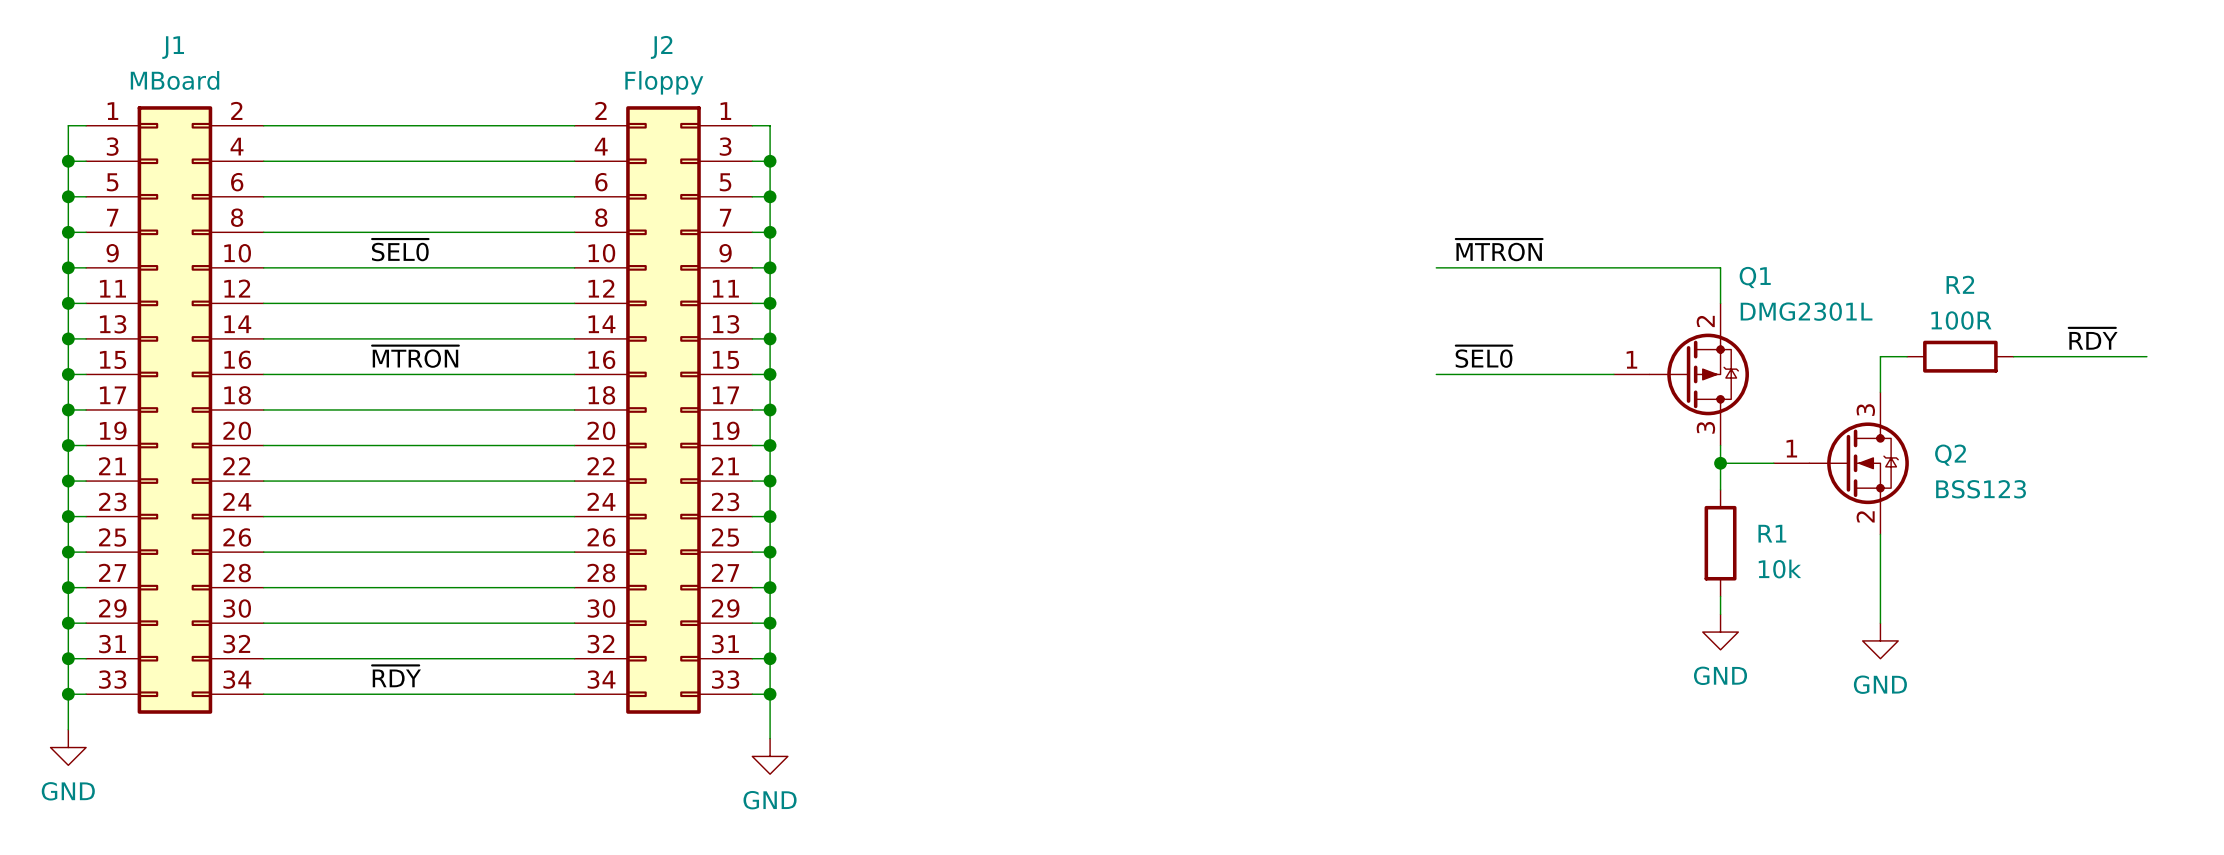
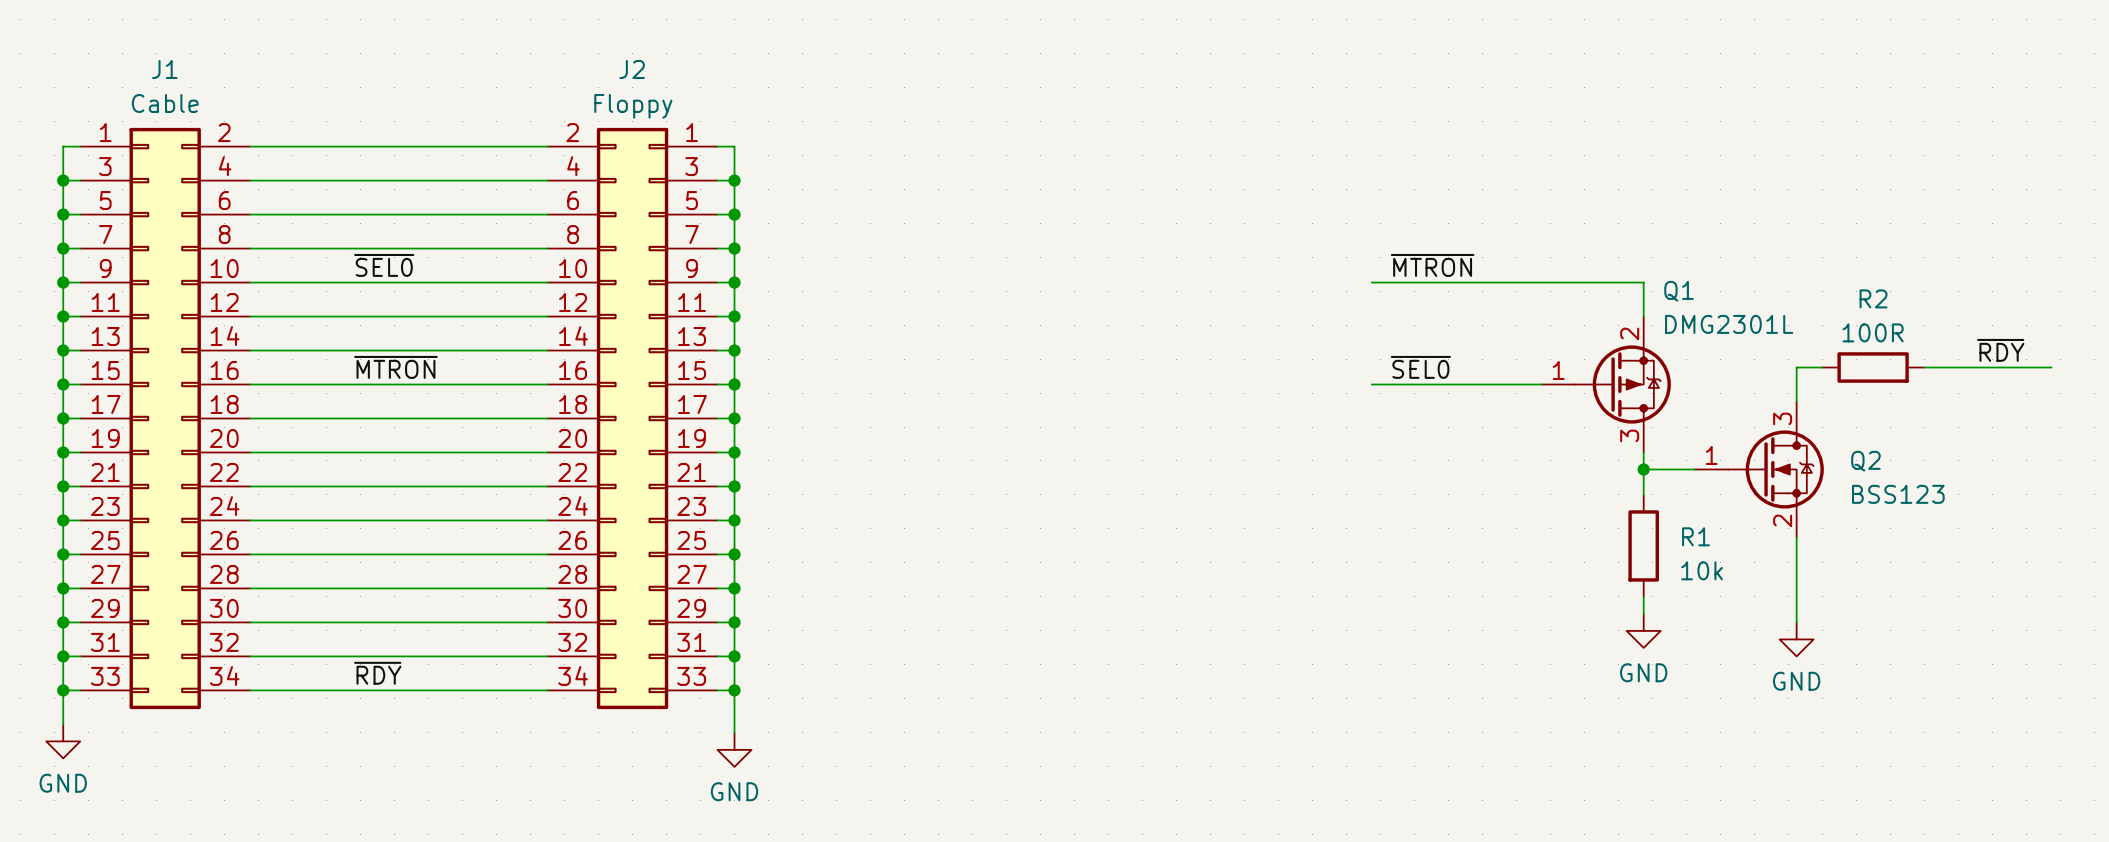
J1 value: MBoard (175, 80) -> Cable (165, 103)

